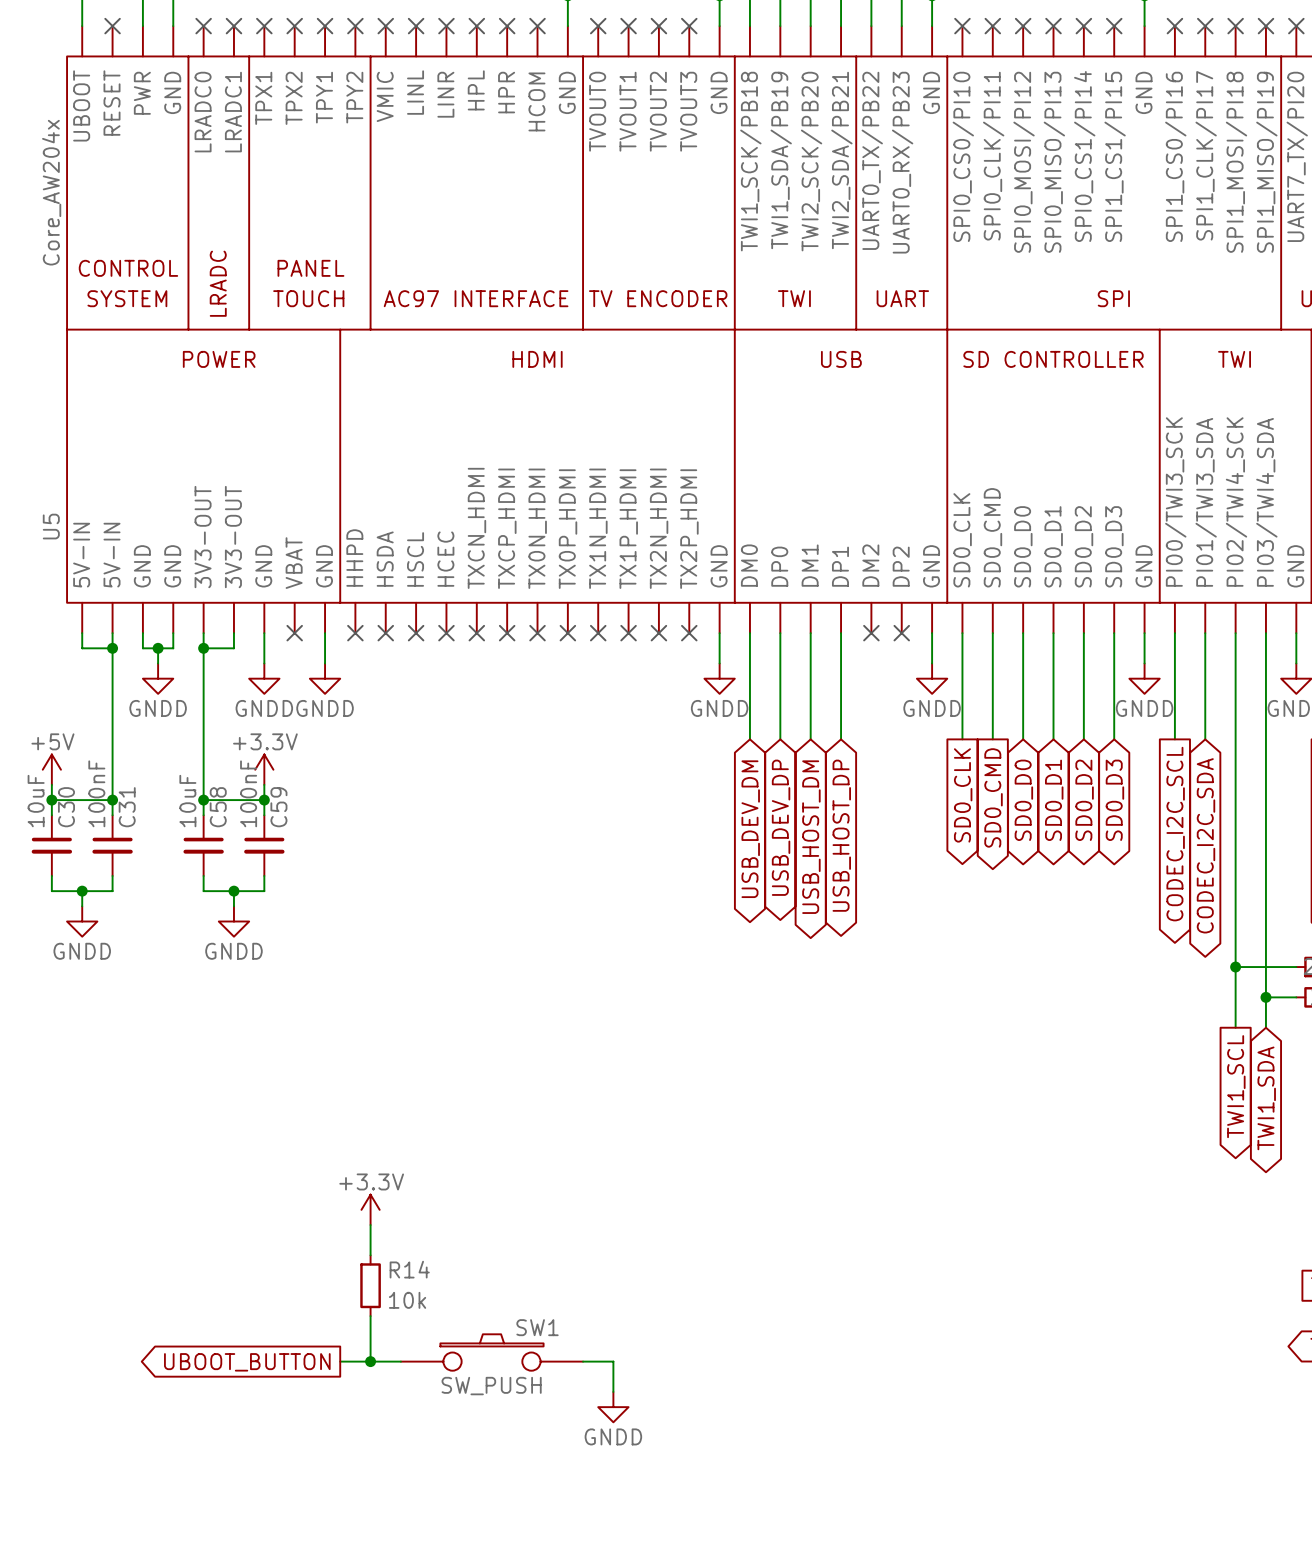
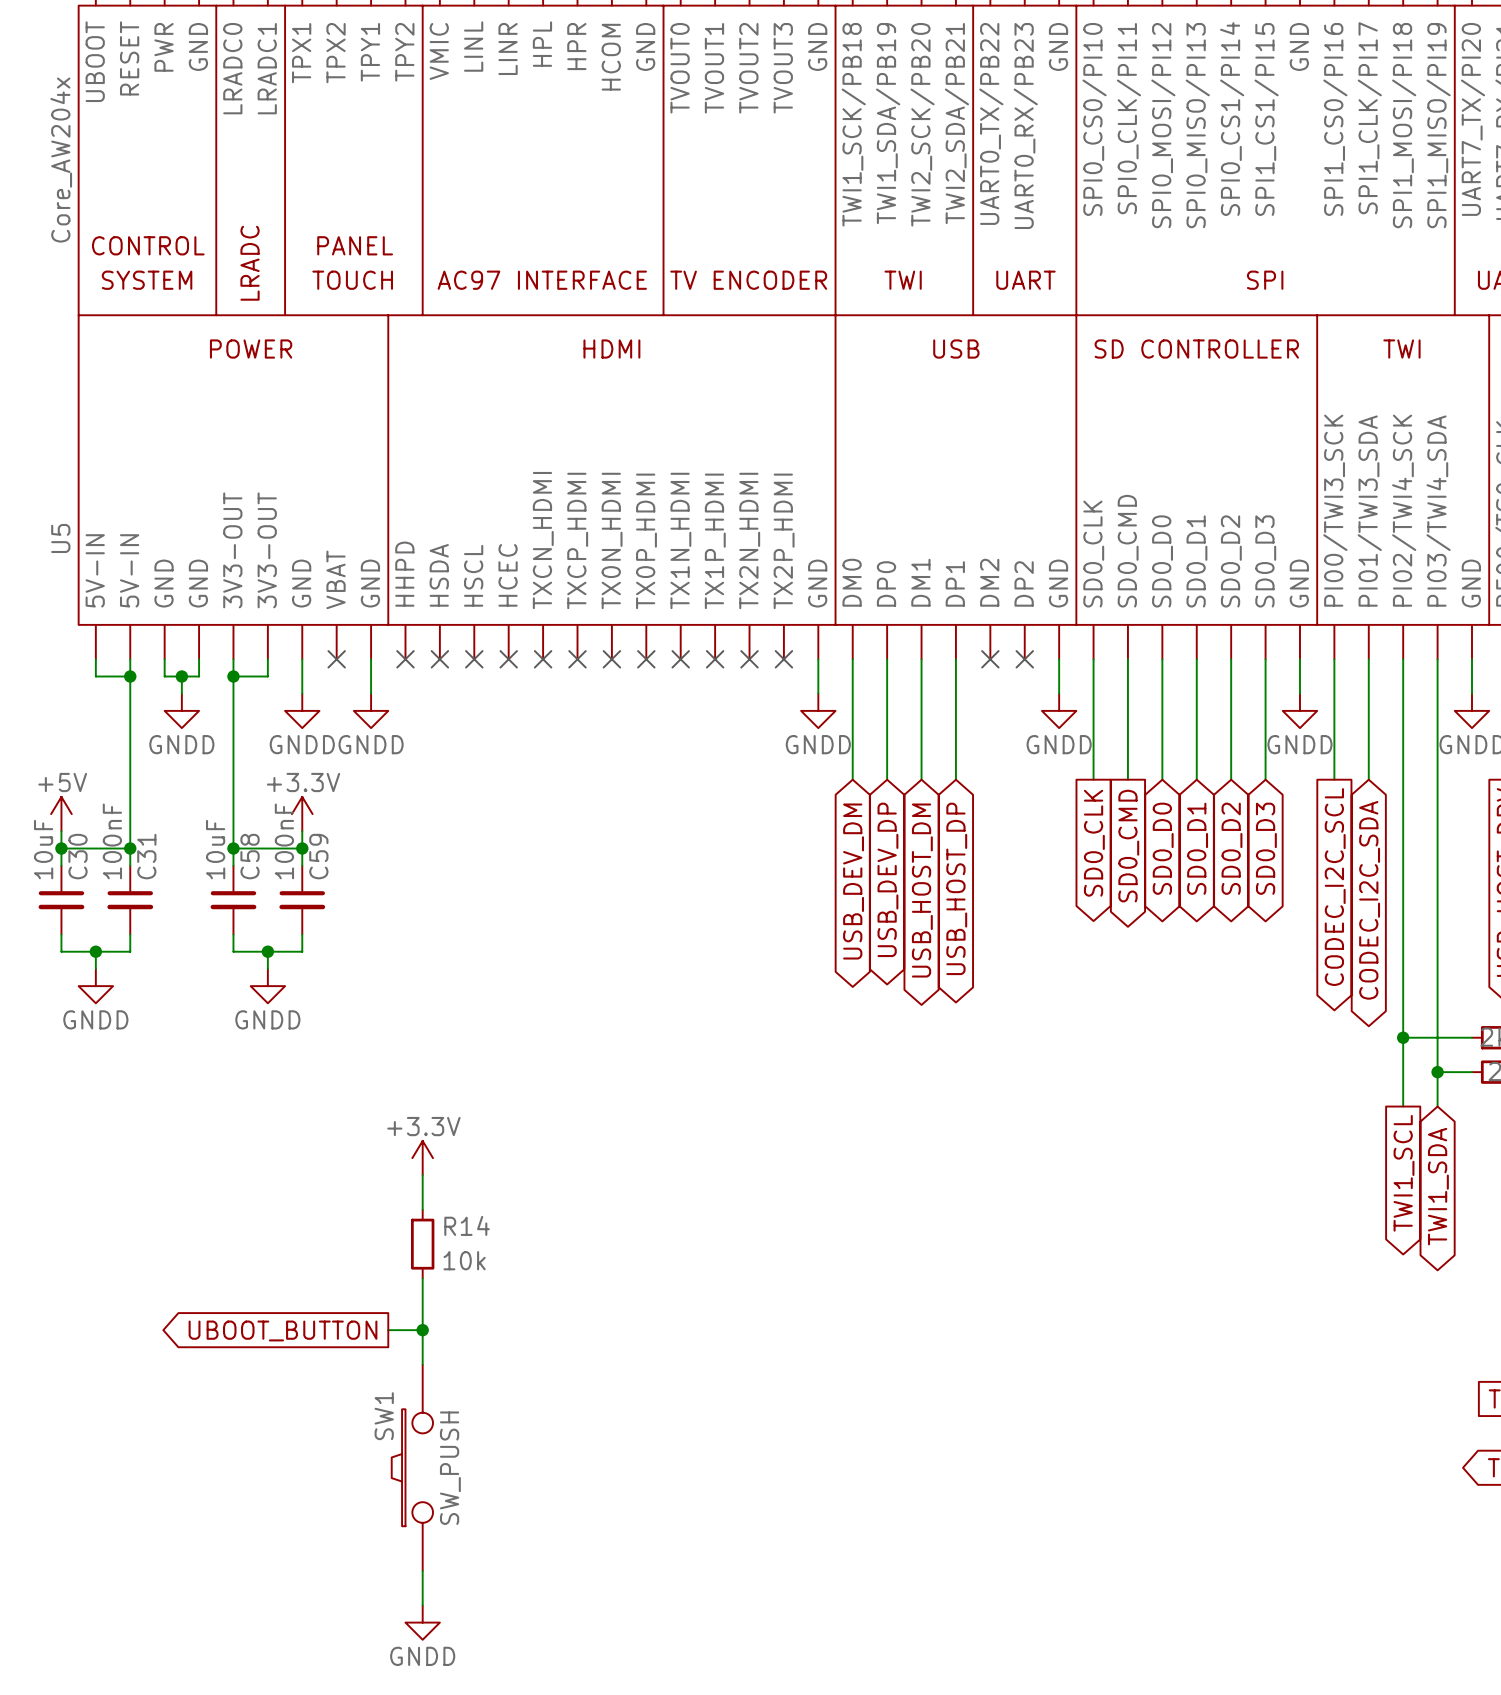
wire: none -> (422, 1175) (422, 1209)
wire: none -> (422, 1278) (422, 1330) (388, 1330)
power symbol position: +3.3V (370, 1209) -> +3.3V (422, 1158)
junction: none -> (422, 1330)
R14 position: (370, 1285) -> (422, 1244)
wire: (370, 1316) (370, 1361) -> none
SW1 rotation: 0° (491, 1340) -> 90° counterclockwise (398, 1467)
SW1 position: (491, 1352) -> (412, 1467)
wire: (340, 1361) (400, 1361) -> none
junction: (370, 1361) -> none
wire: (583, 1361) (613, 1361) (613, 1391) -> none
global label position: UBOOT_BUTTON (247, 1362) -> UBOOT_BUTTON (283, 1330)
power symbol position: GNDD (613, 1407) -> GNDD (422, 1622)
wire: none -> (422, 1570) (422, 1605)

